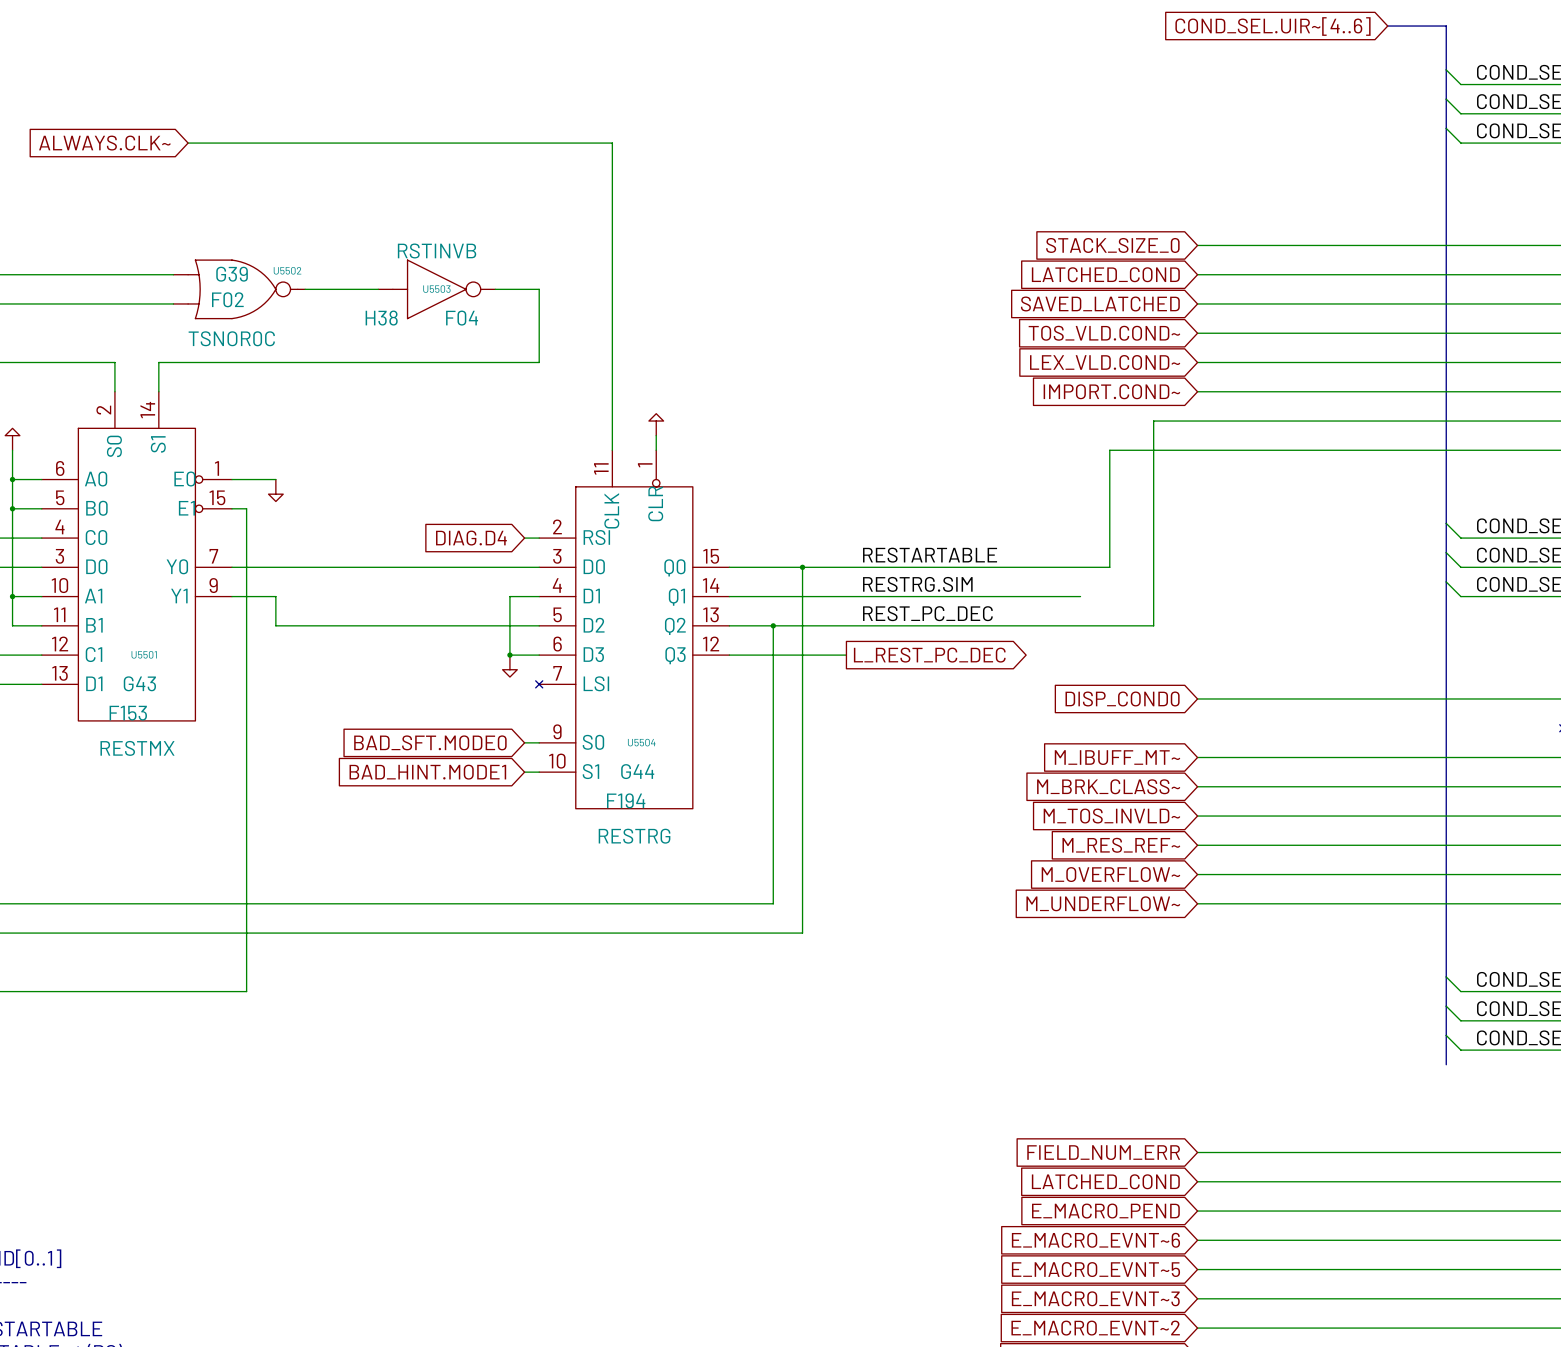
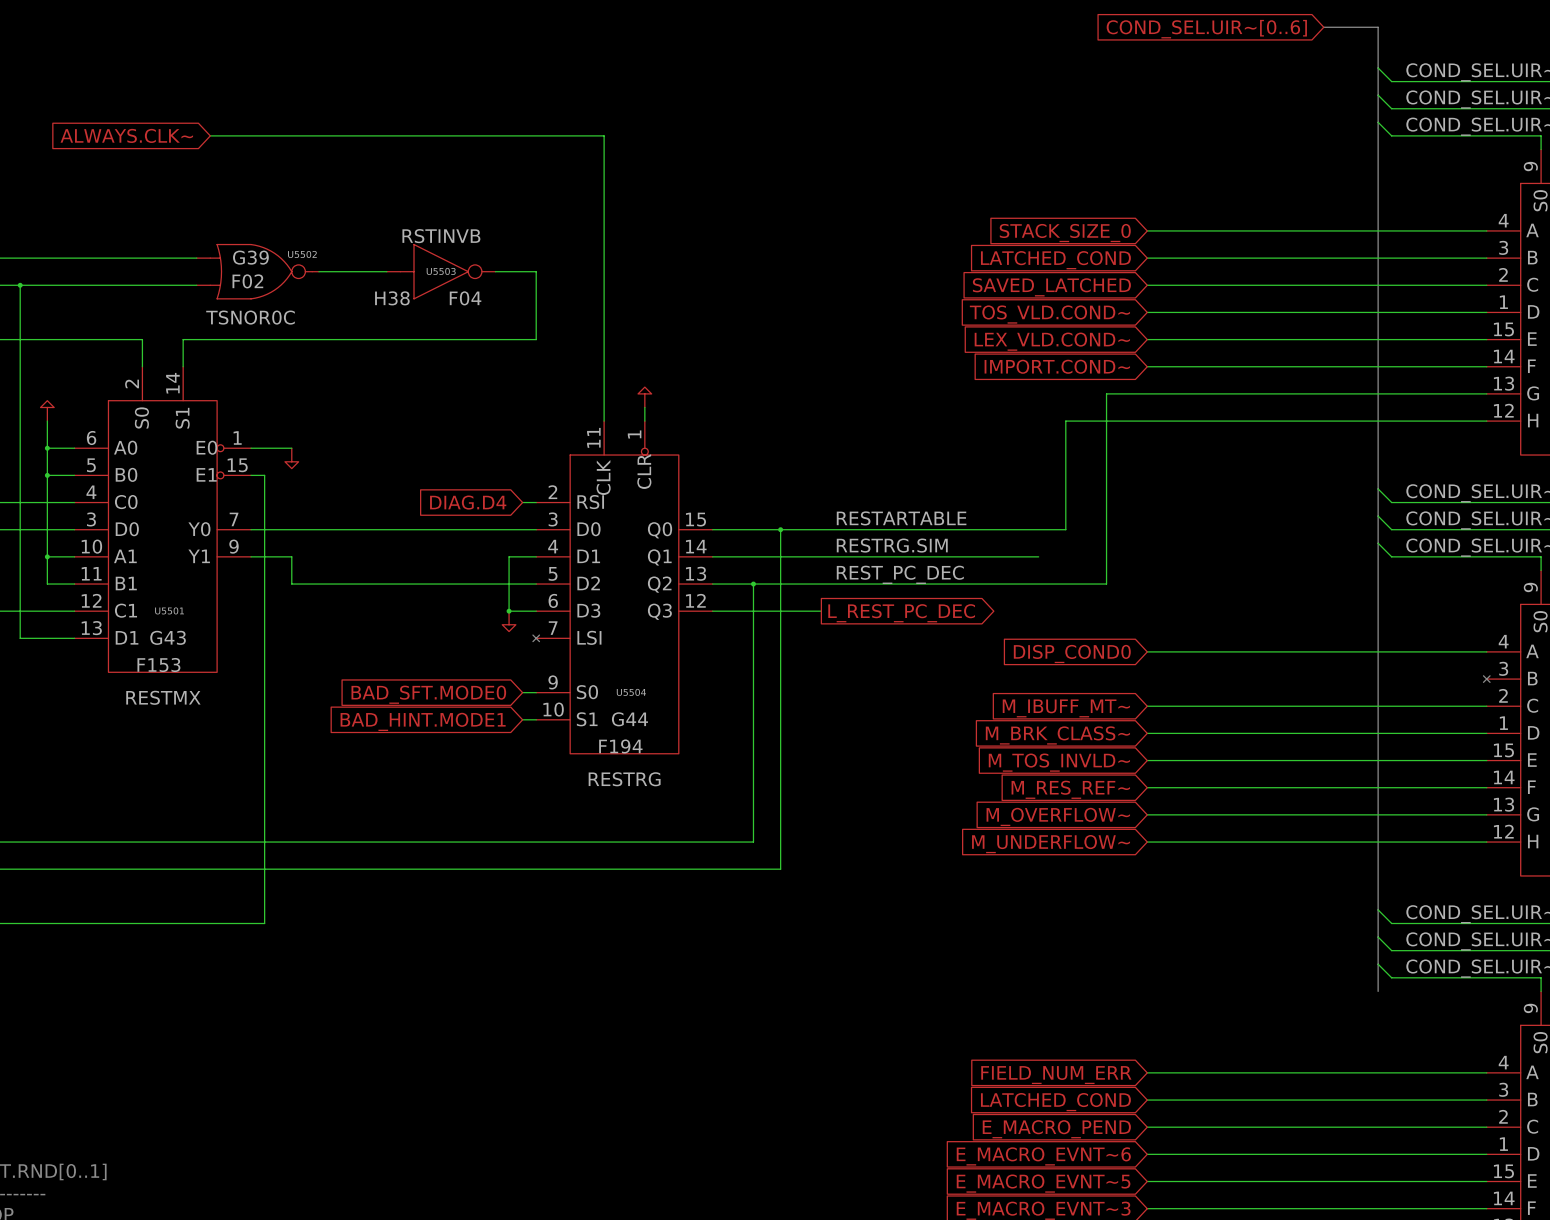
global label: COND_SEL.UIR~[4..6] (1273, 26) -> COND_SEL.UIR~[0..6] (1206, 29)

